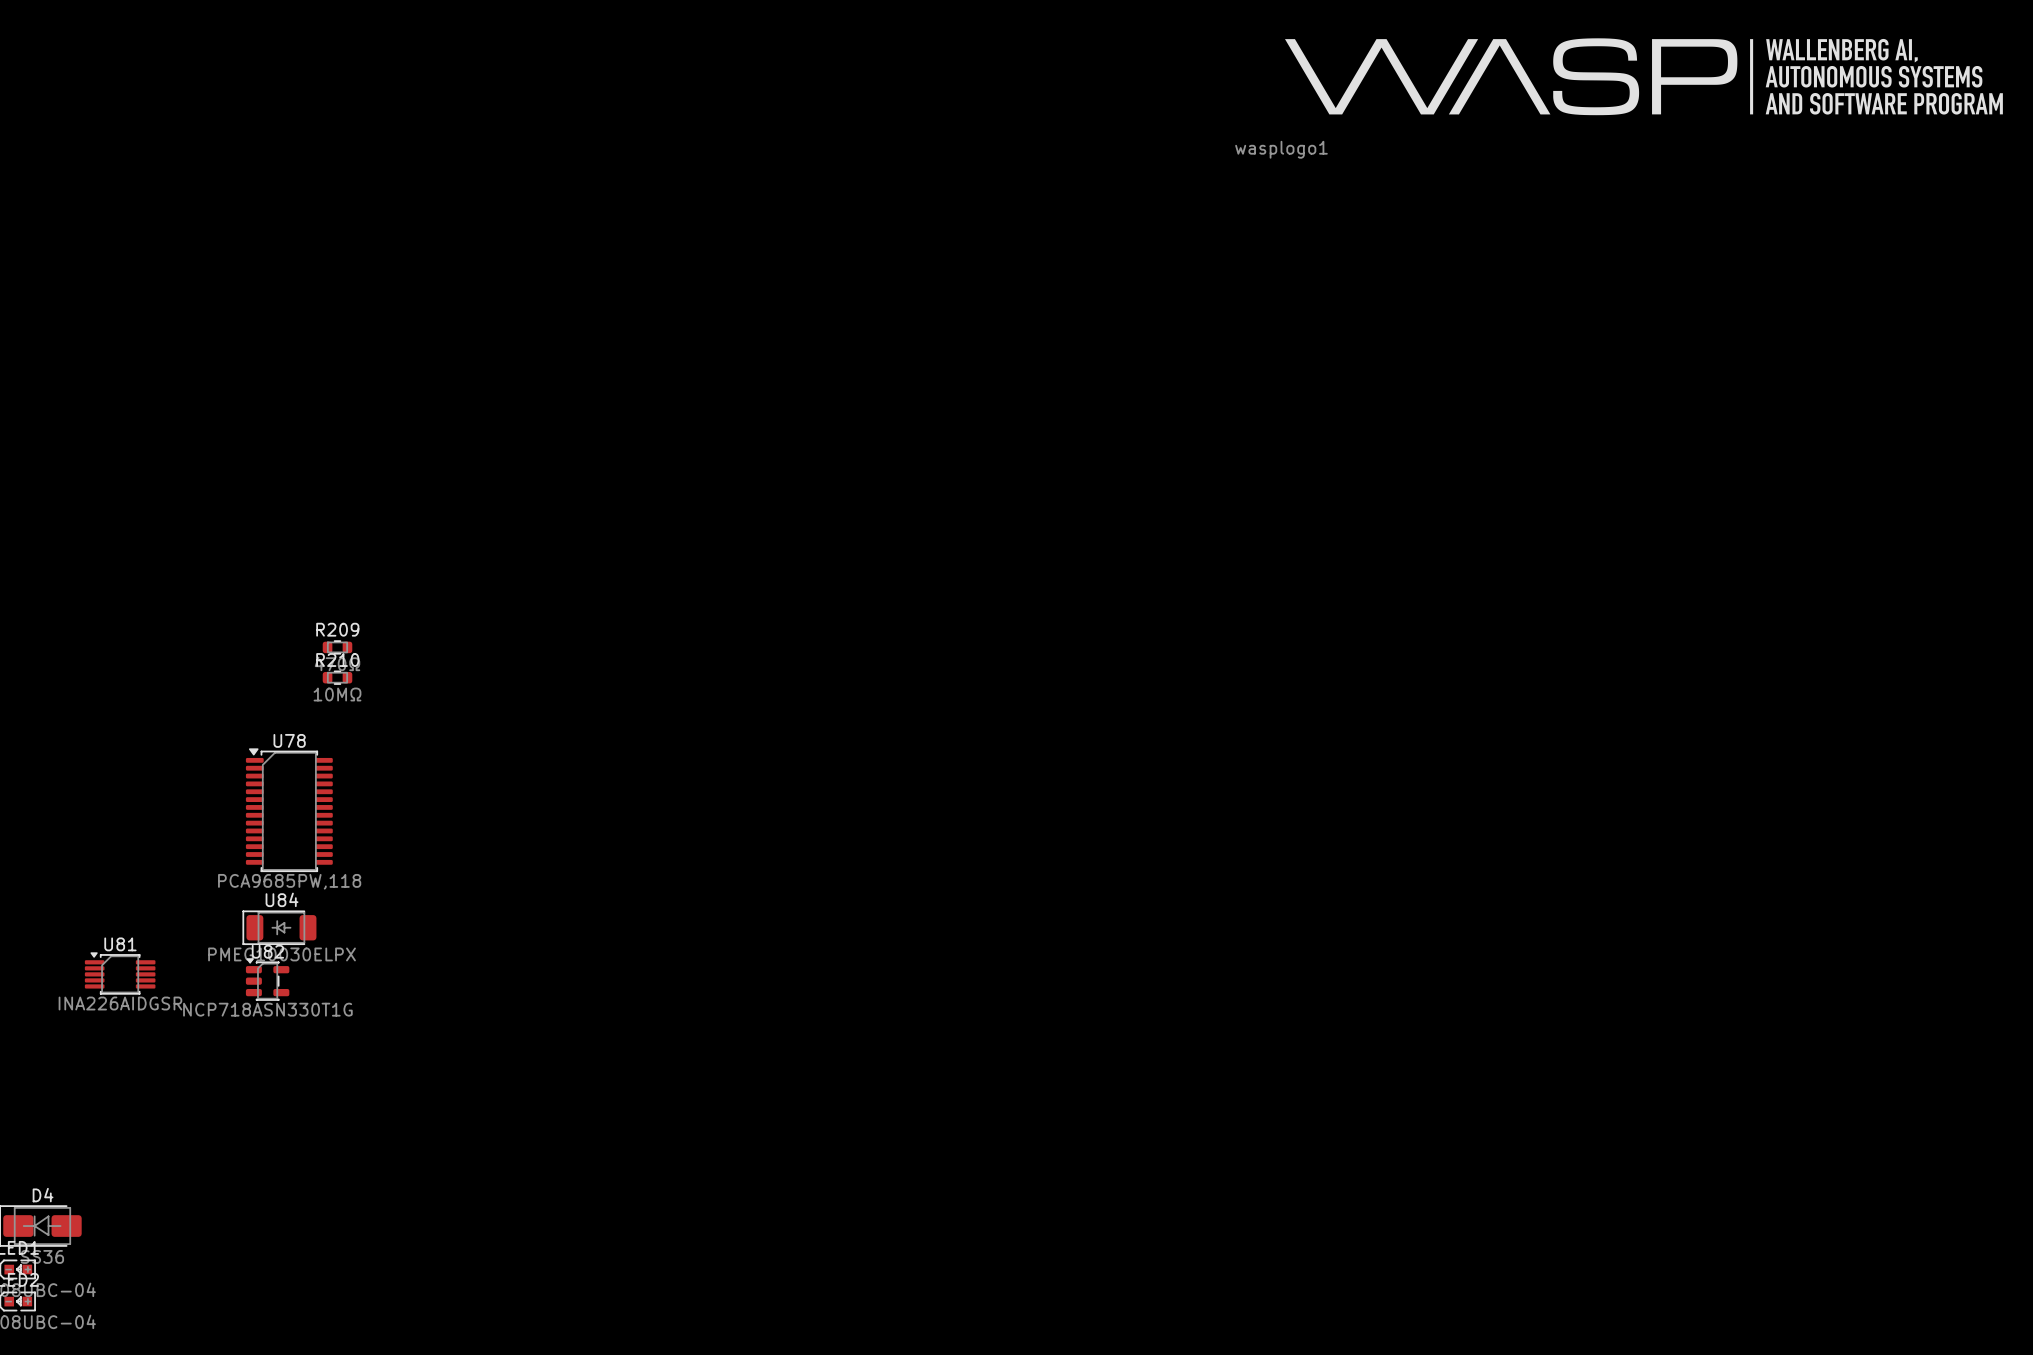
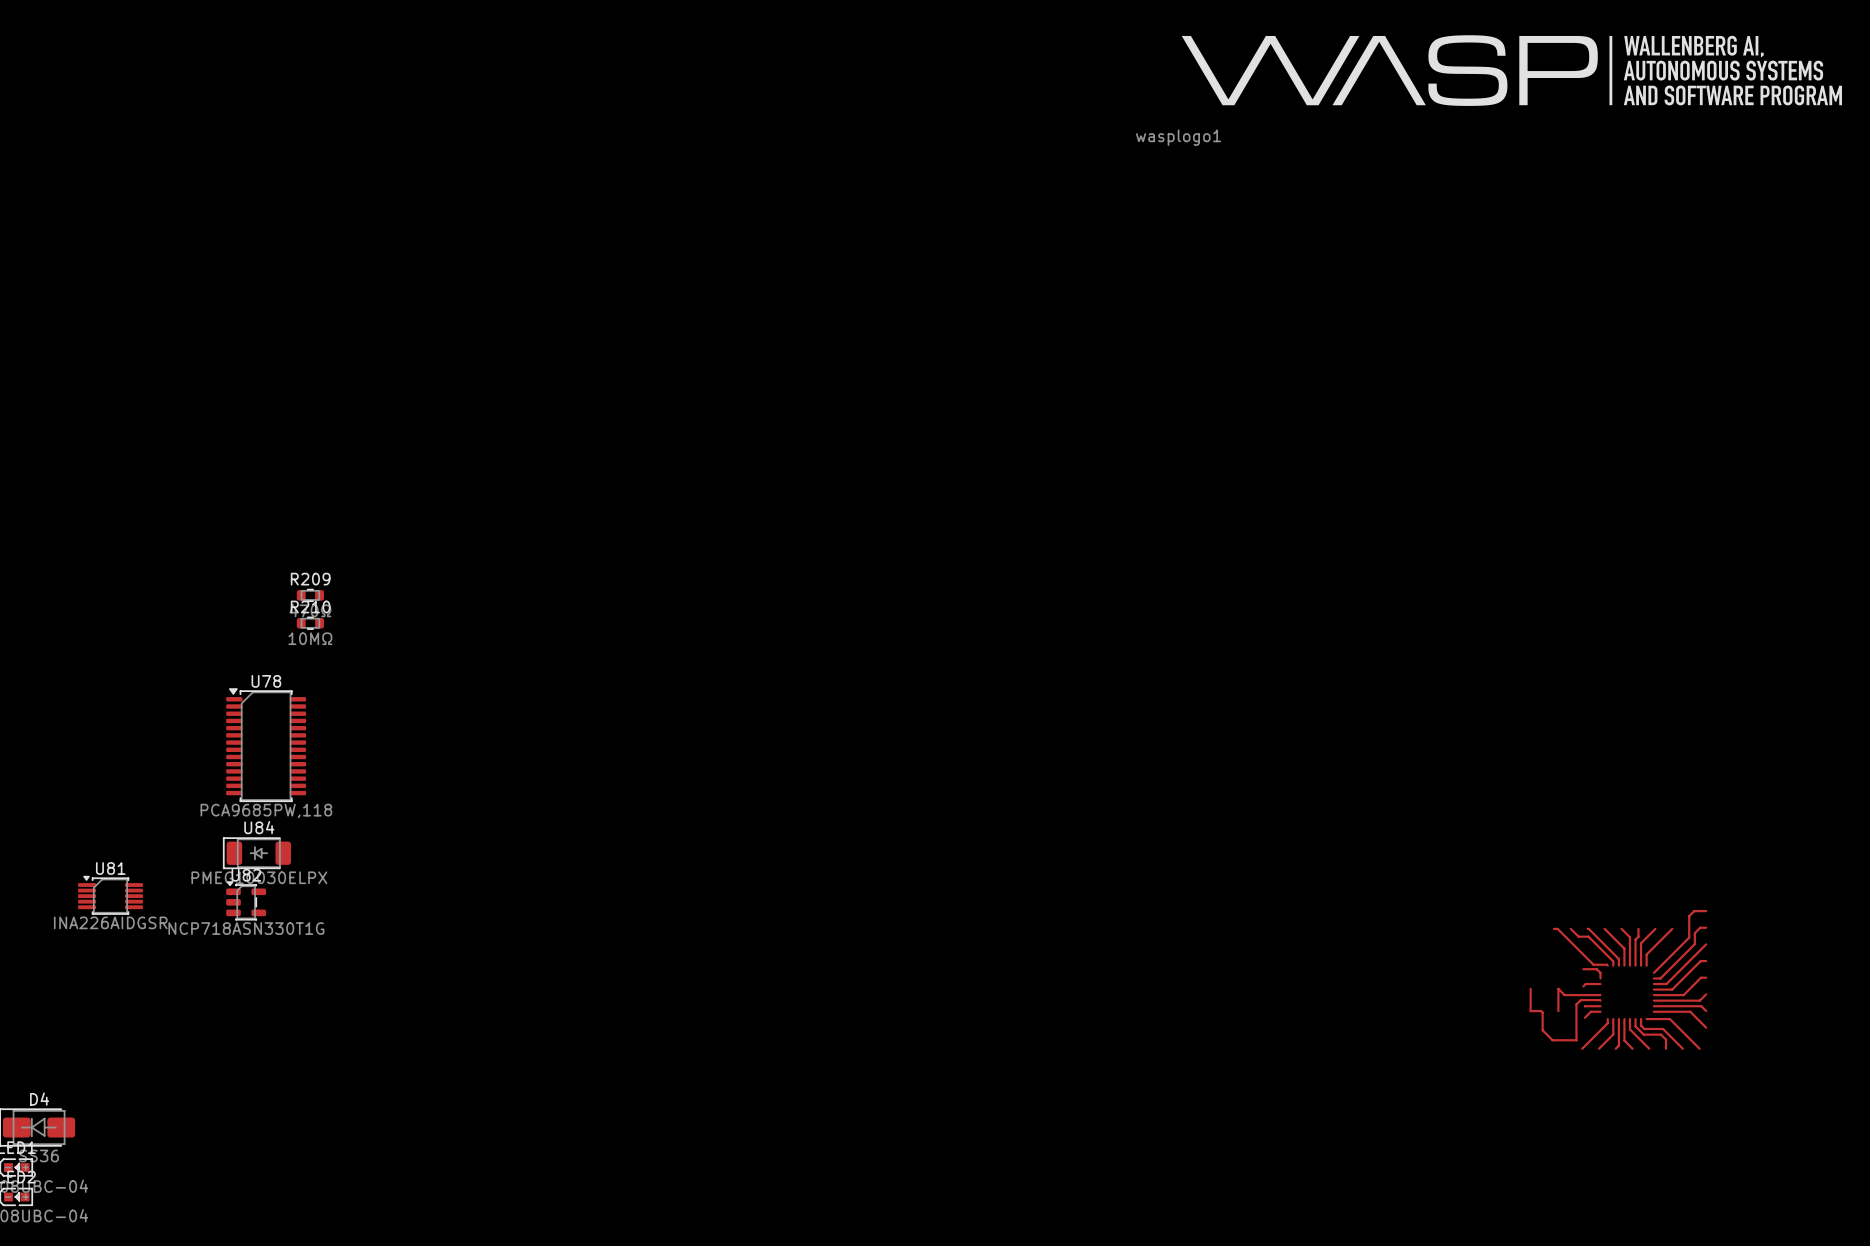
track: none -> (1706, 911) (1694, 911) (1689, 916) (1689, 937) (1653, 972)
track: none -> (1706, 927) (1700, 927) (1694, 933) (1694, 944) (1660, 978) (1653, 978)
track: none -> (1553, 928) (1557, 928) (1593, 964) (1607, 965)
track: none -> (1570, 928) (1578, 936) (1588, 936) (1613, 961) (1613, 965)
track: none -> (1587, 928) (1618, 959) (1618, 965)
track: none -> (1604, 928) (1624, 948) (1624, 965)
track: none -> (1621, 928) (1629, 937) (1629, 965)
track: none -> (1638, 928) (1638, 936)
track: none -> (1655, 928) (1641, 943) (1641, 965)
track: none -> (1672, 928) (1646, 954) (1646, 965)
track: none -> (1638, 936) (1635, 939) (1635, 965)
track: none -> (1706, 944) (1666, 984) (1653, 984)
track: none -> (1706, 961) (1700, 961) (1672, 989) (1653, 989)
track: none -> (1583, 969) (1596, 969) (1600, 972) (1600, 978)
track: none -> (1706, 977) (1701, 977) (1683, 995) (1653, 995)
track: none -> (1600, 984) (1585, 984) (1583, 986)
track: none -> (1530, 988) (1530, 1011) (1542, 1012) (1542, 1030) (1552, 1040) (1576, 1040) (1576, 1004) (1580, 1000) (1600, 1000)
track: none -> (1706, 994) (1699, 1000) (1653, 1000)
track: none -> (1600, 995) (1564, 995) (1558, 988) (1558, 1011)
track: none -> (1600, 1006) (1584, 1006)
track: none -> (1653, 1006) (1701, 1006) (1706, 1011)
track: none -> (1600, 1011) (1590, 1011) (1584, 1017)
track: none -> (1653, 1011) (1690, 1011) (1706, 1027)
track: none -> (1607, 1019) (1607, 1023) (1582, 1048)
track: none -> (1613, 1019) (1613, 1034) (1599, 1048)
track: none -> (1618, 1019) (1618, 1045) (1615, 1048)
track: none -> (1624, 1019) (1624, 1040) (1632, 1048)
track: none -> (1629, 1019) (1629, 1029) (1649, 1048)
track: none -> (1635, 1019) (1635, 1026) (1643, 1034) (1661, 1034) (1666, 1039) (1666, 1048)
track: none -> (1641, 1019) (1641, 1025) (1644, 1028) (1663, 1028) (1682, 1048)
track: none -> (1646, 1019) (1669, 1019) (1699, 1048)

